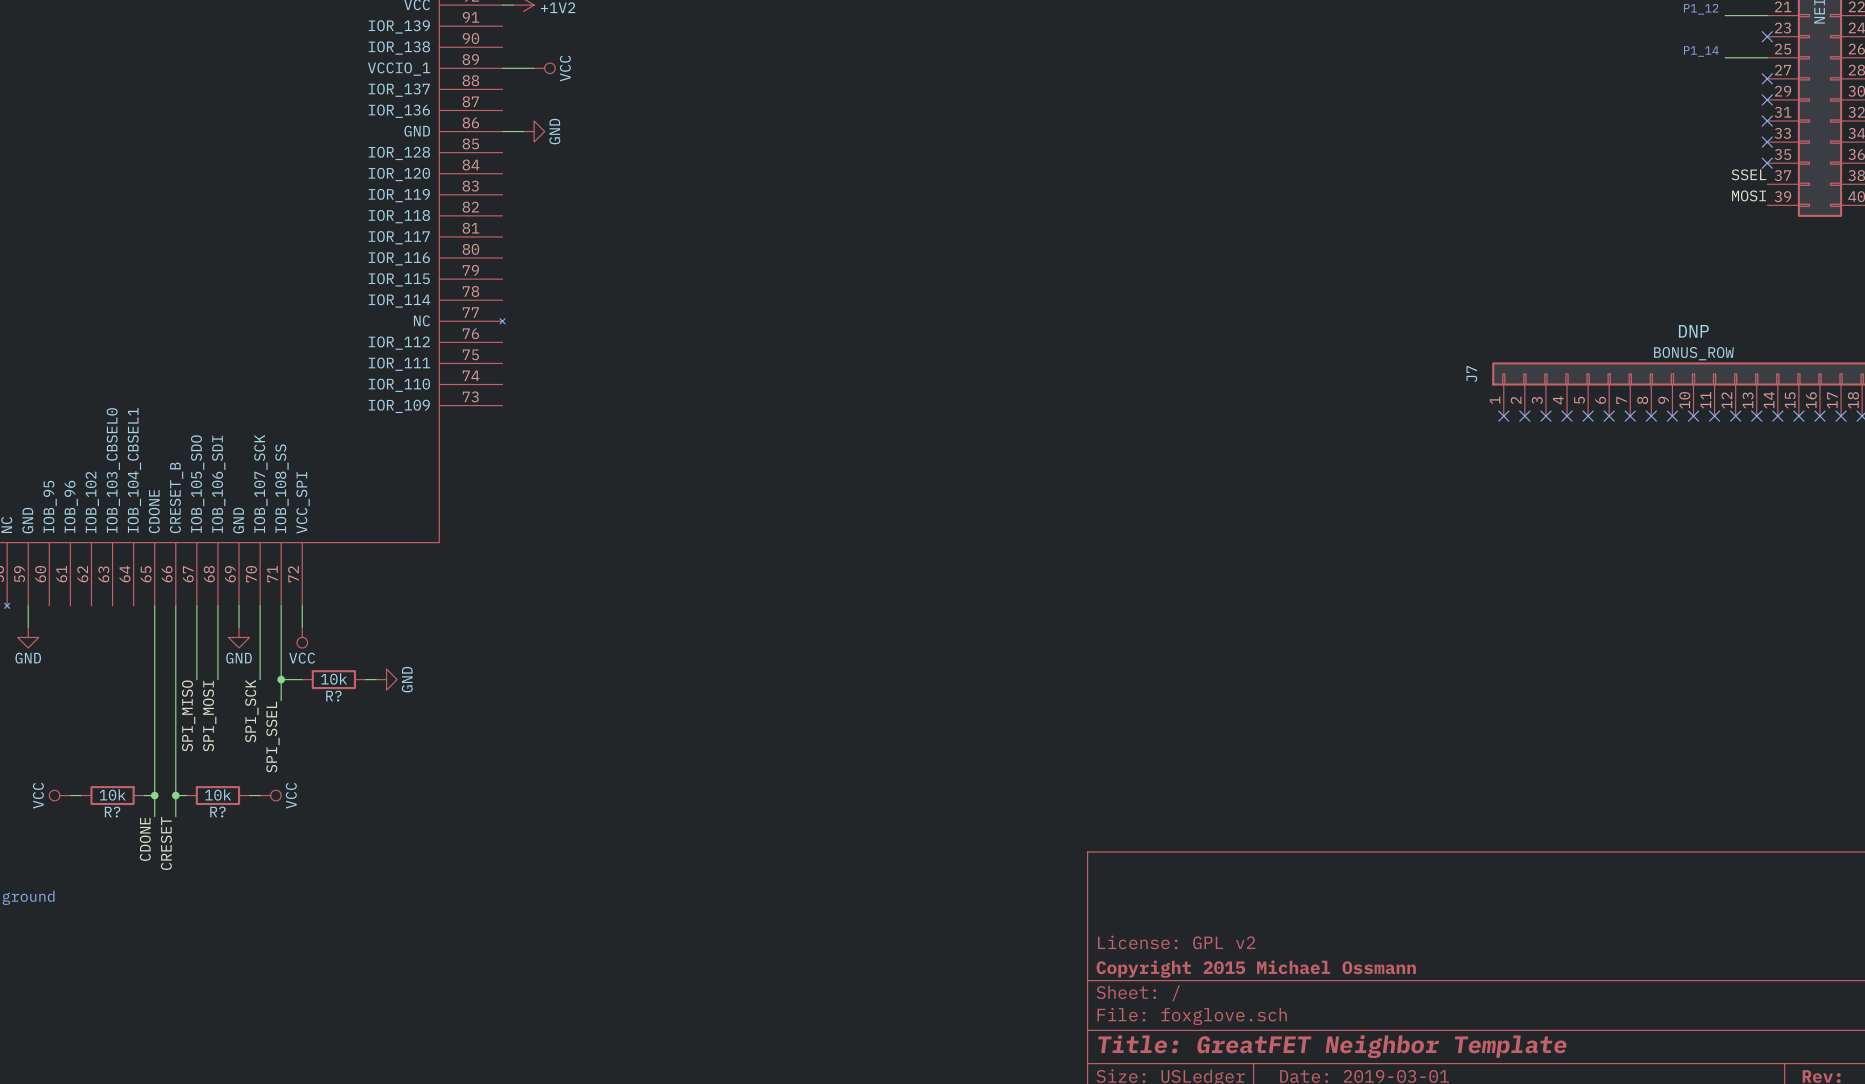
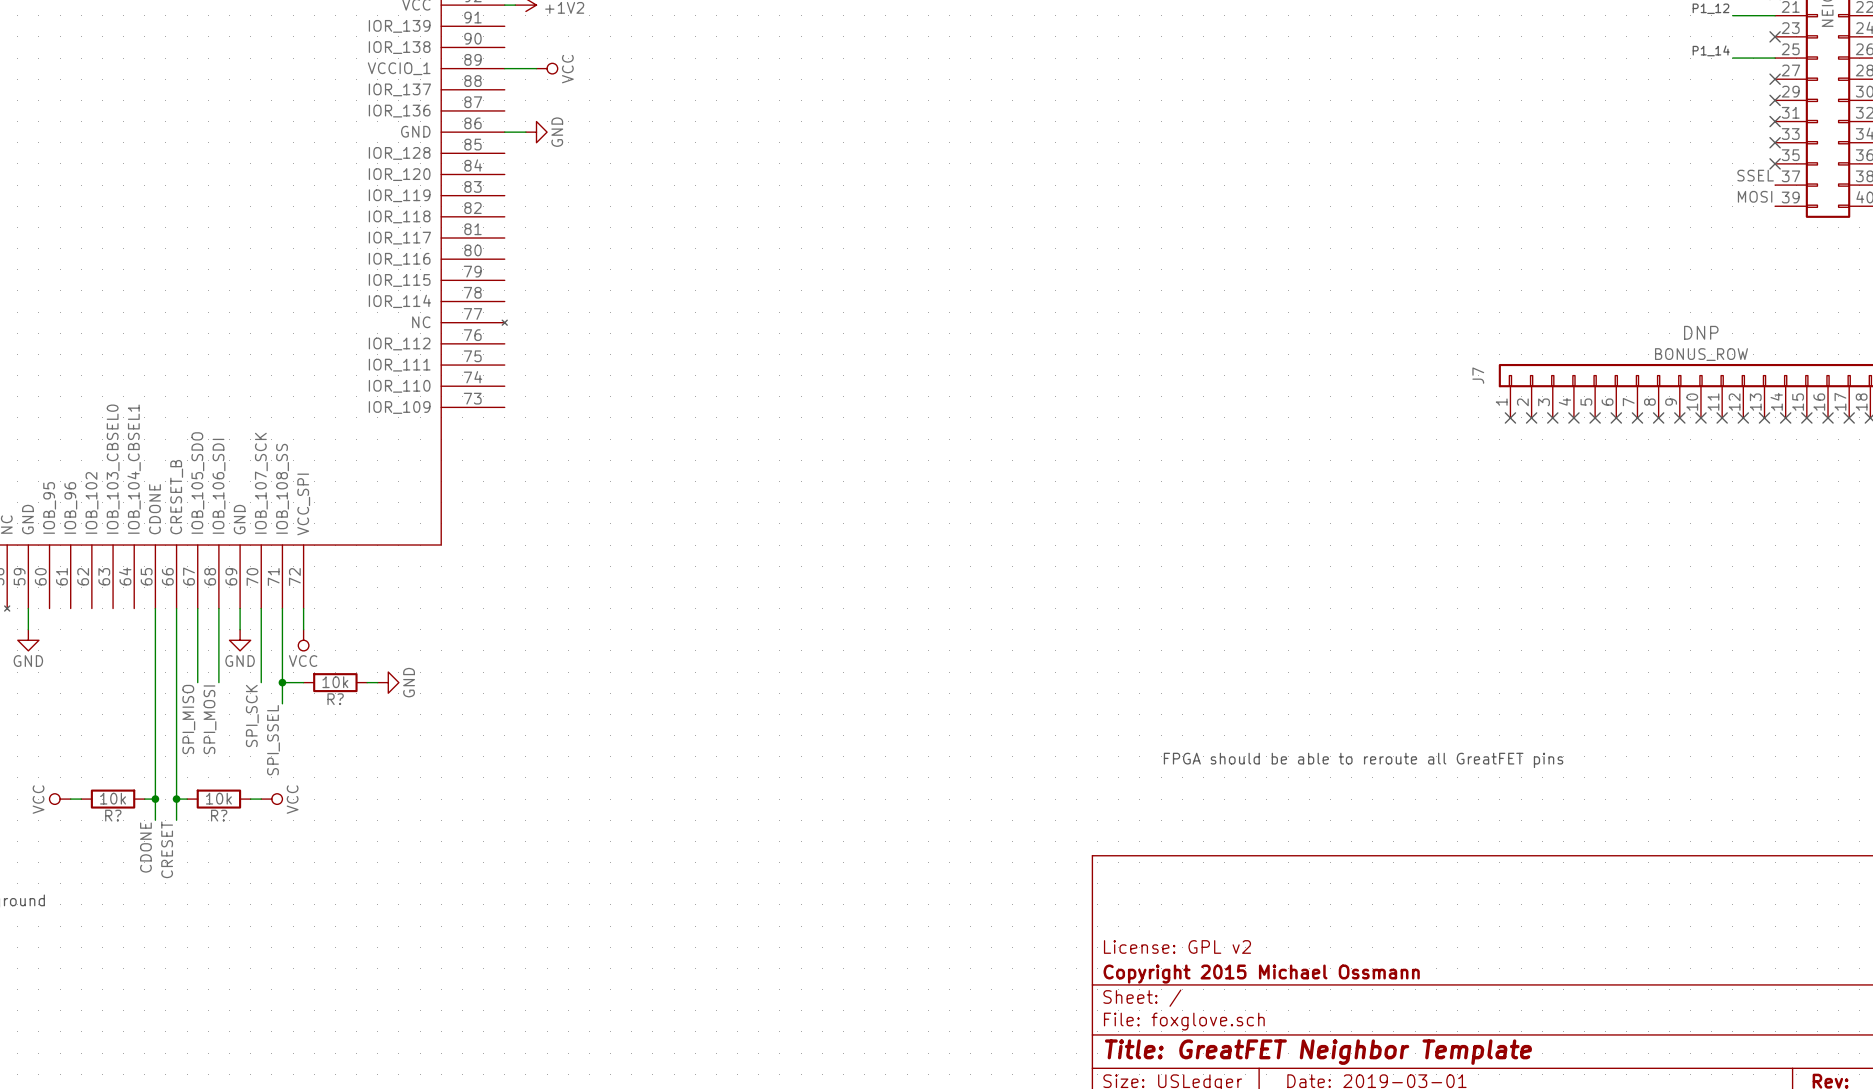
text: none -> FPGA should be able to reroute all GreatFET pins (1363, 760)

